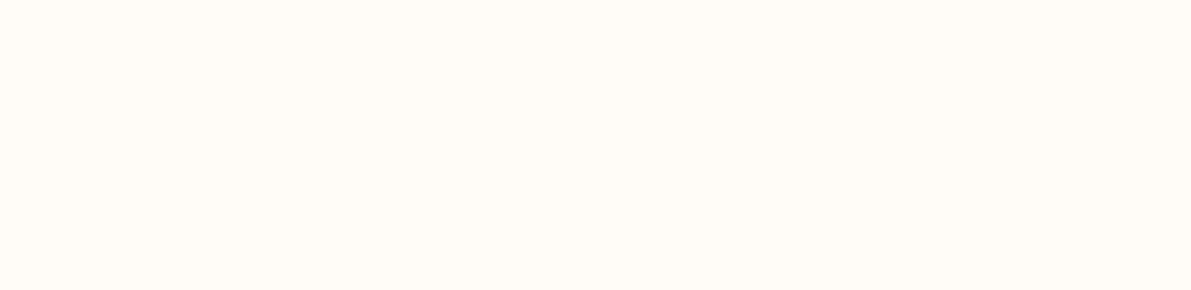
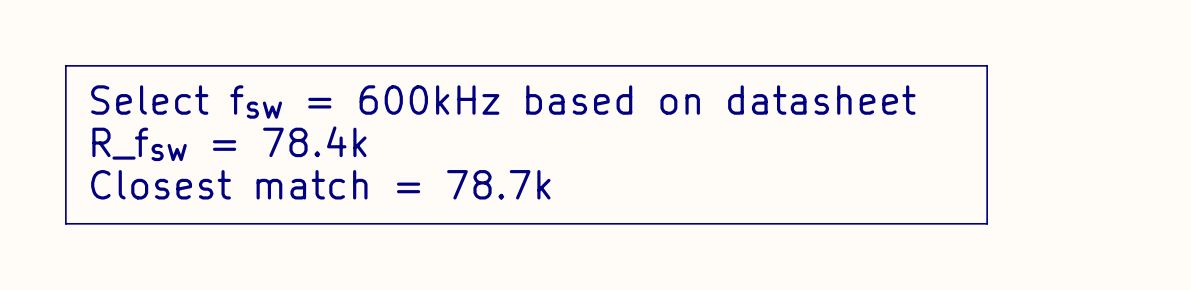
line: none -> (65, 65) (987, 65) (987, 223) (65, 223) (65, 65)
text: none -> Select fsw = 600kHz based on datasheet (503, 101)
text: none -> R_fsw = 78.4k (229, 143)
text: none -> Closest match = 78.7k (320, 184)

